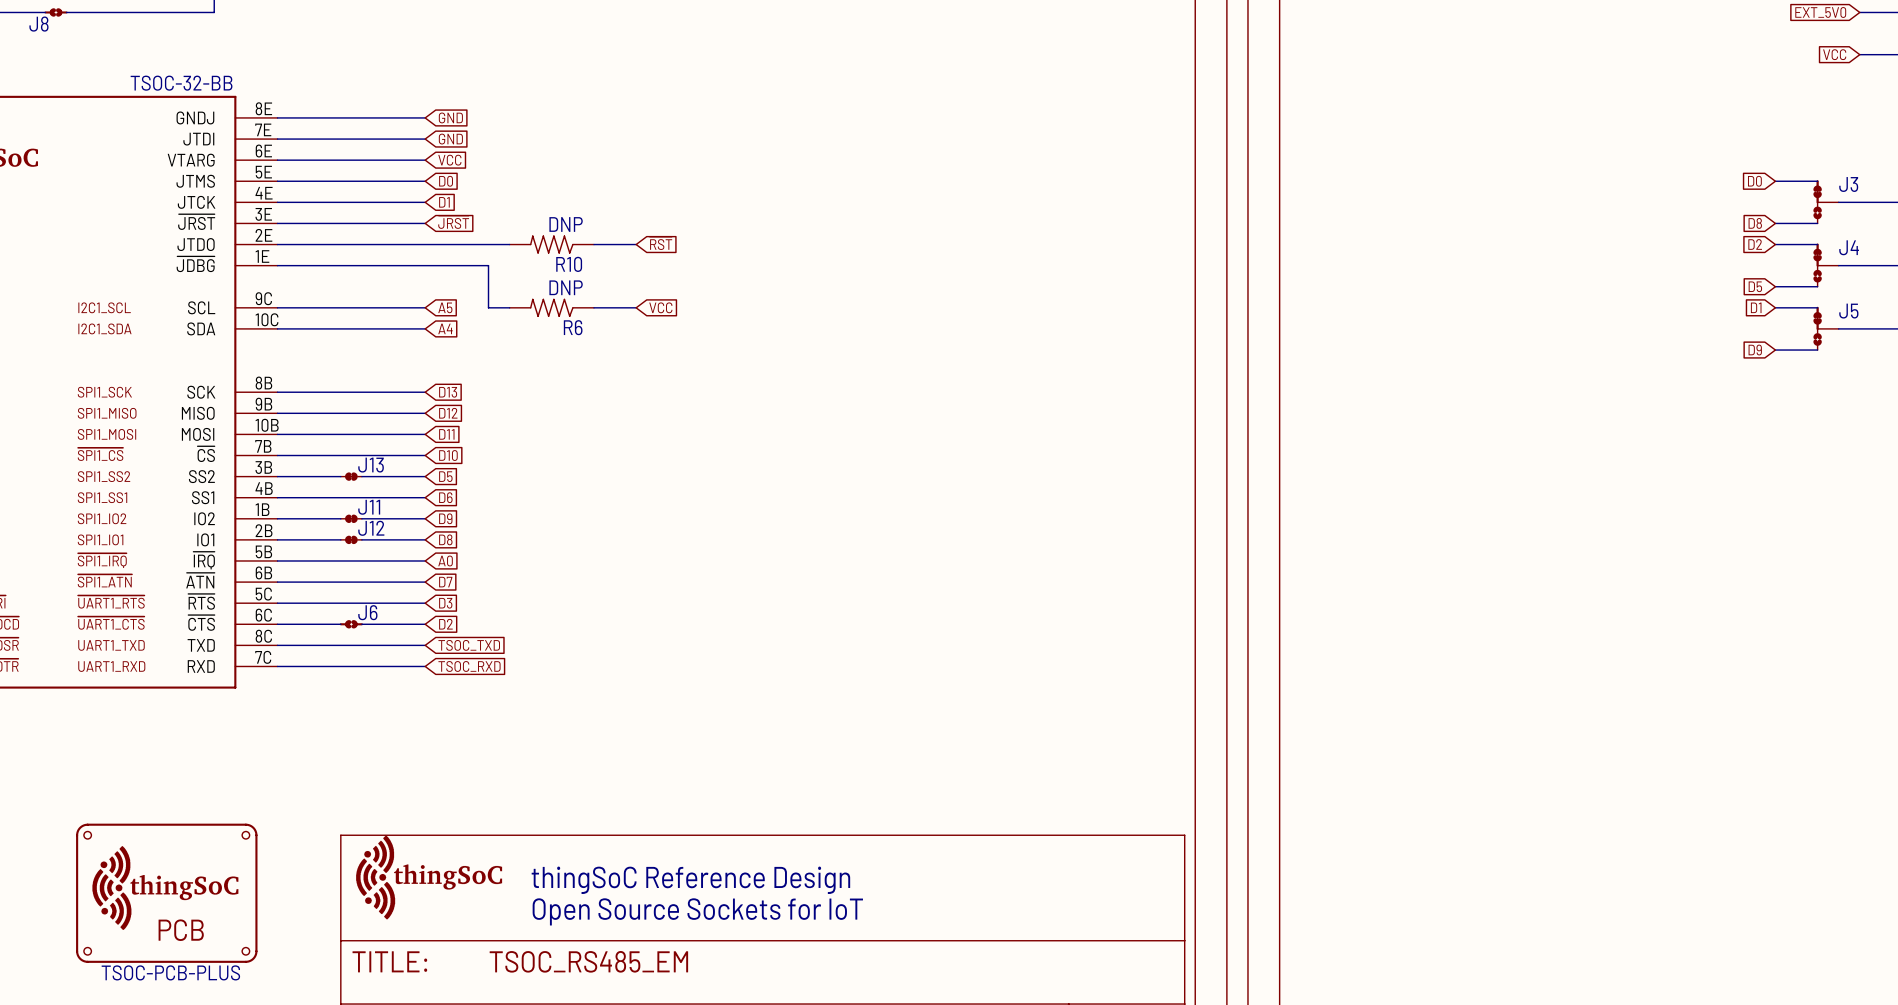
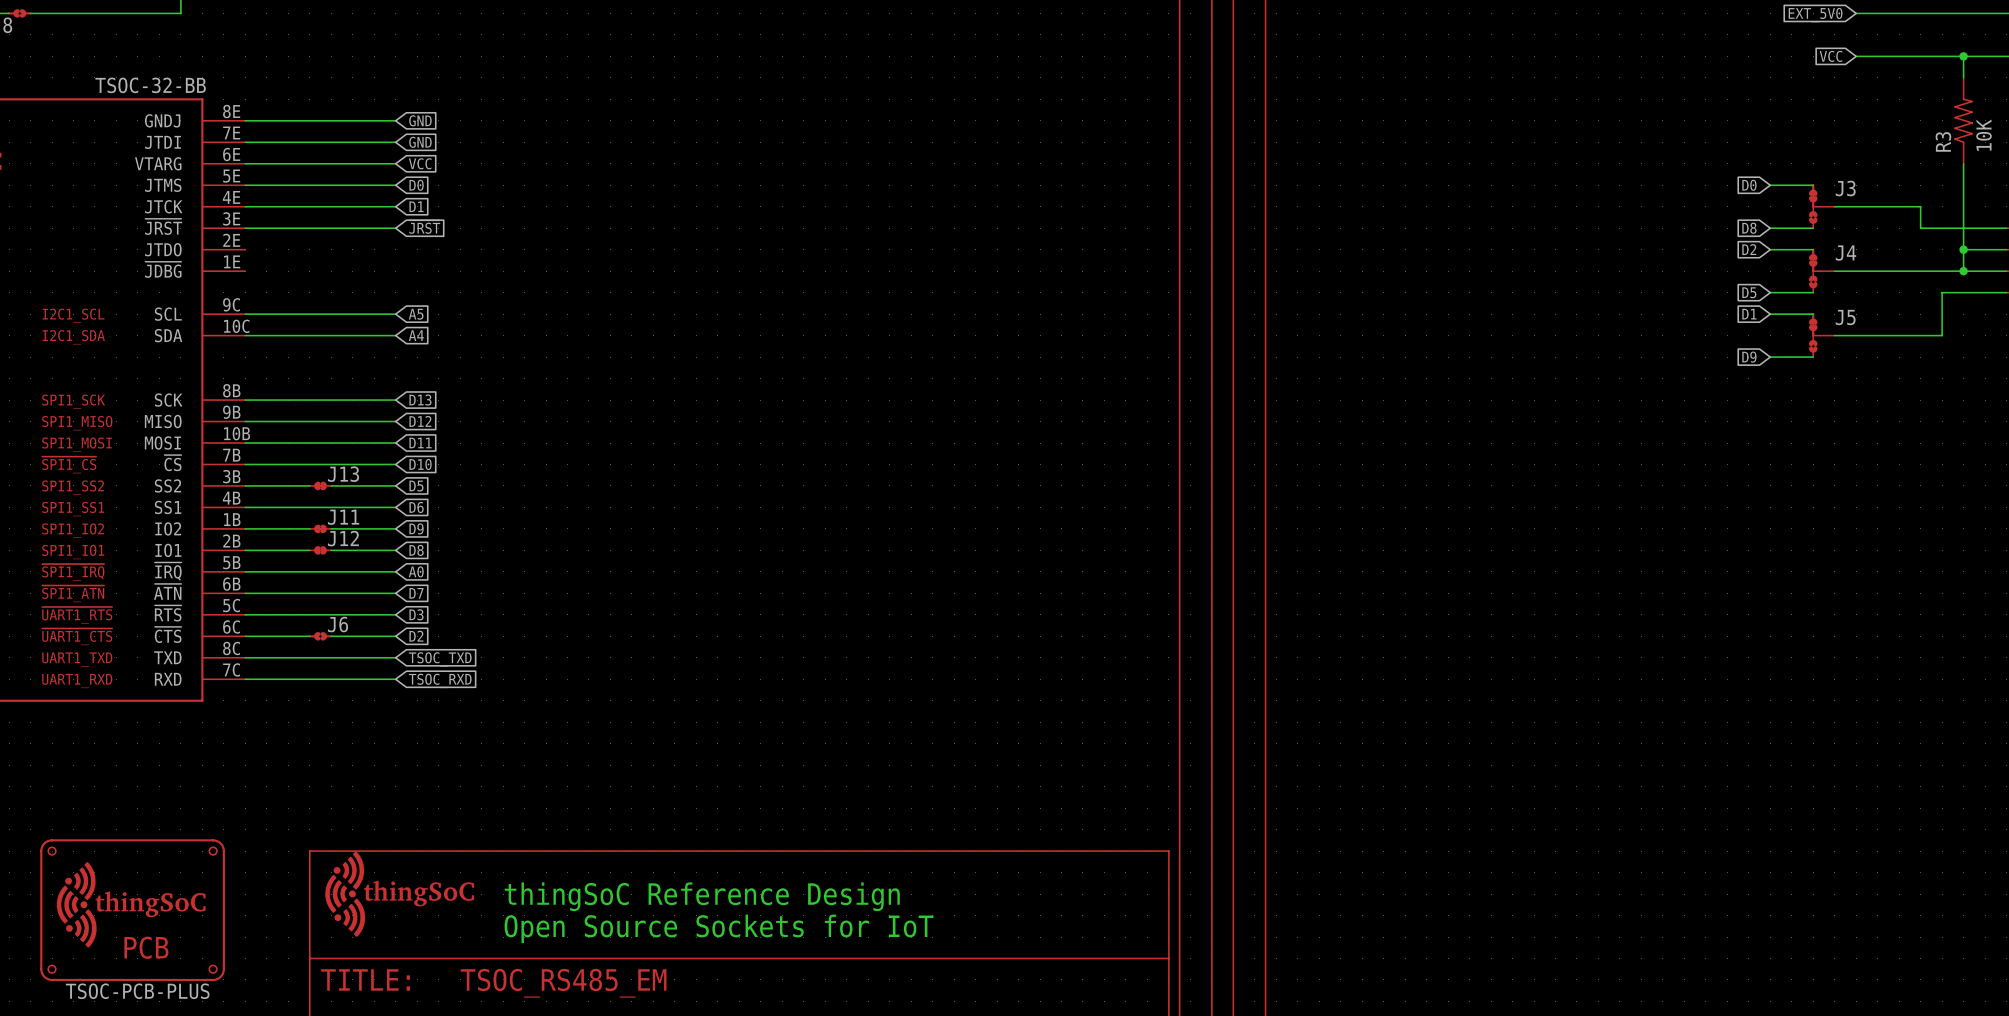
global label: ~{RST} (660, 243) -> none
wire: (277, 244) (509, 244) -> none
R10: DNP (551, 244) -> none
wire: (593, 244) (636, 244) -> none
wire: (277, 265) (488, 265) (488, 307) (509, 307) -> none
R6: DNP (551, 307) -> none
wire: (593, 307) (636, 307) -> none
global label: VCC (660, 307) -> none

